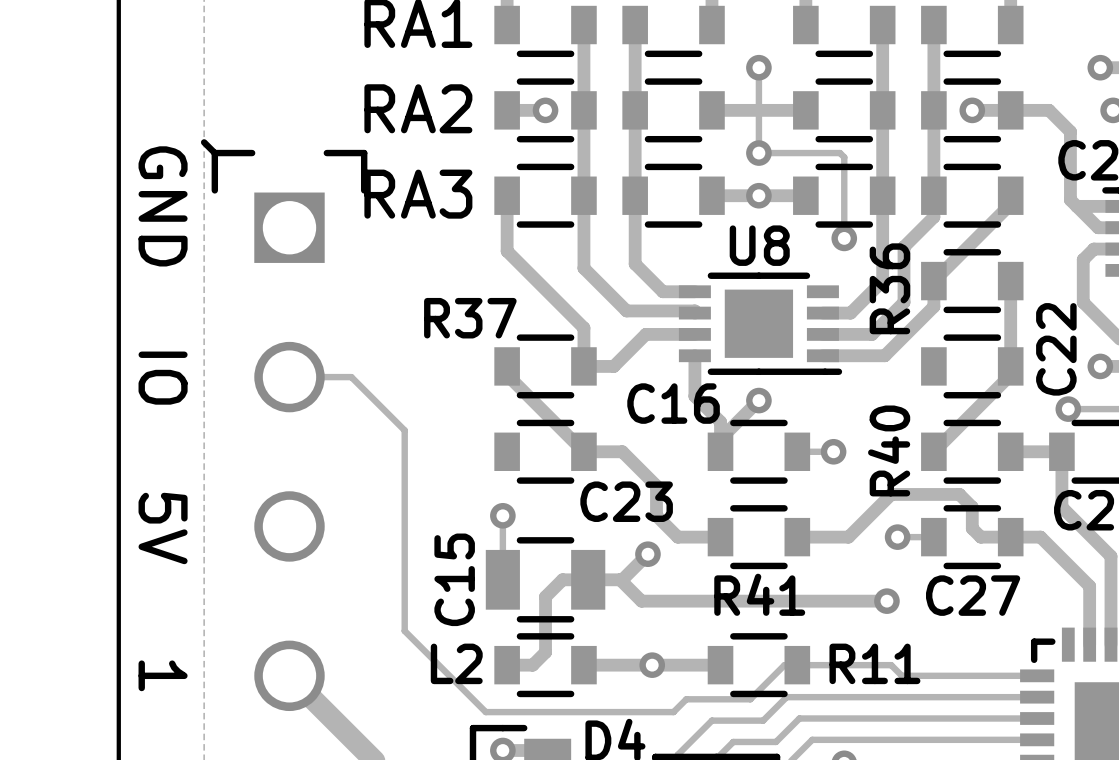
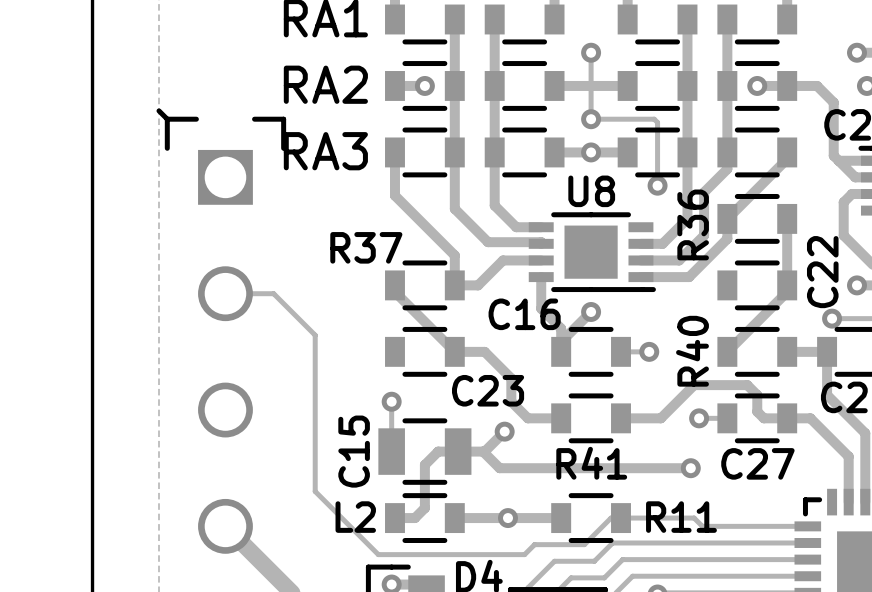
text: GND (163, 206) -> none
text: IO (163, 378) -> none
text: 5V (163, 528) -> none
text: 1 (163, 675) -> none

